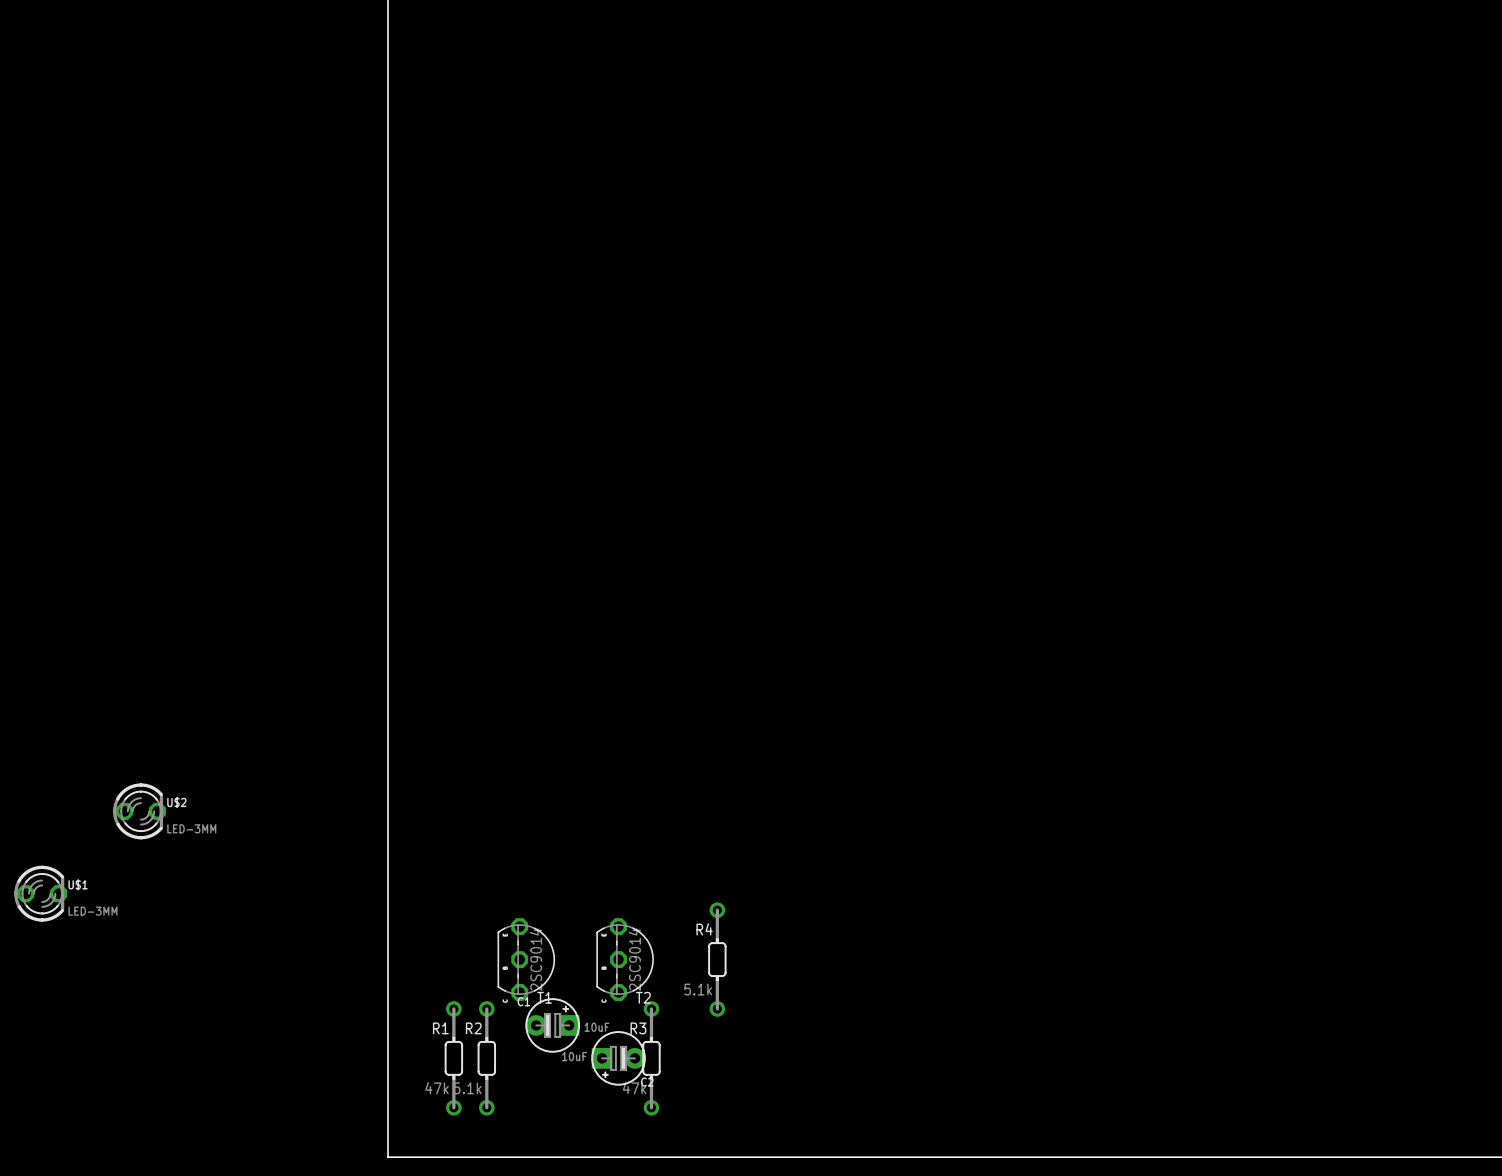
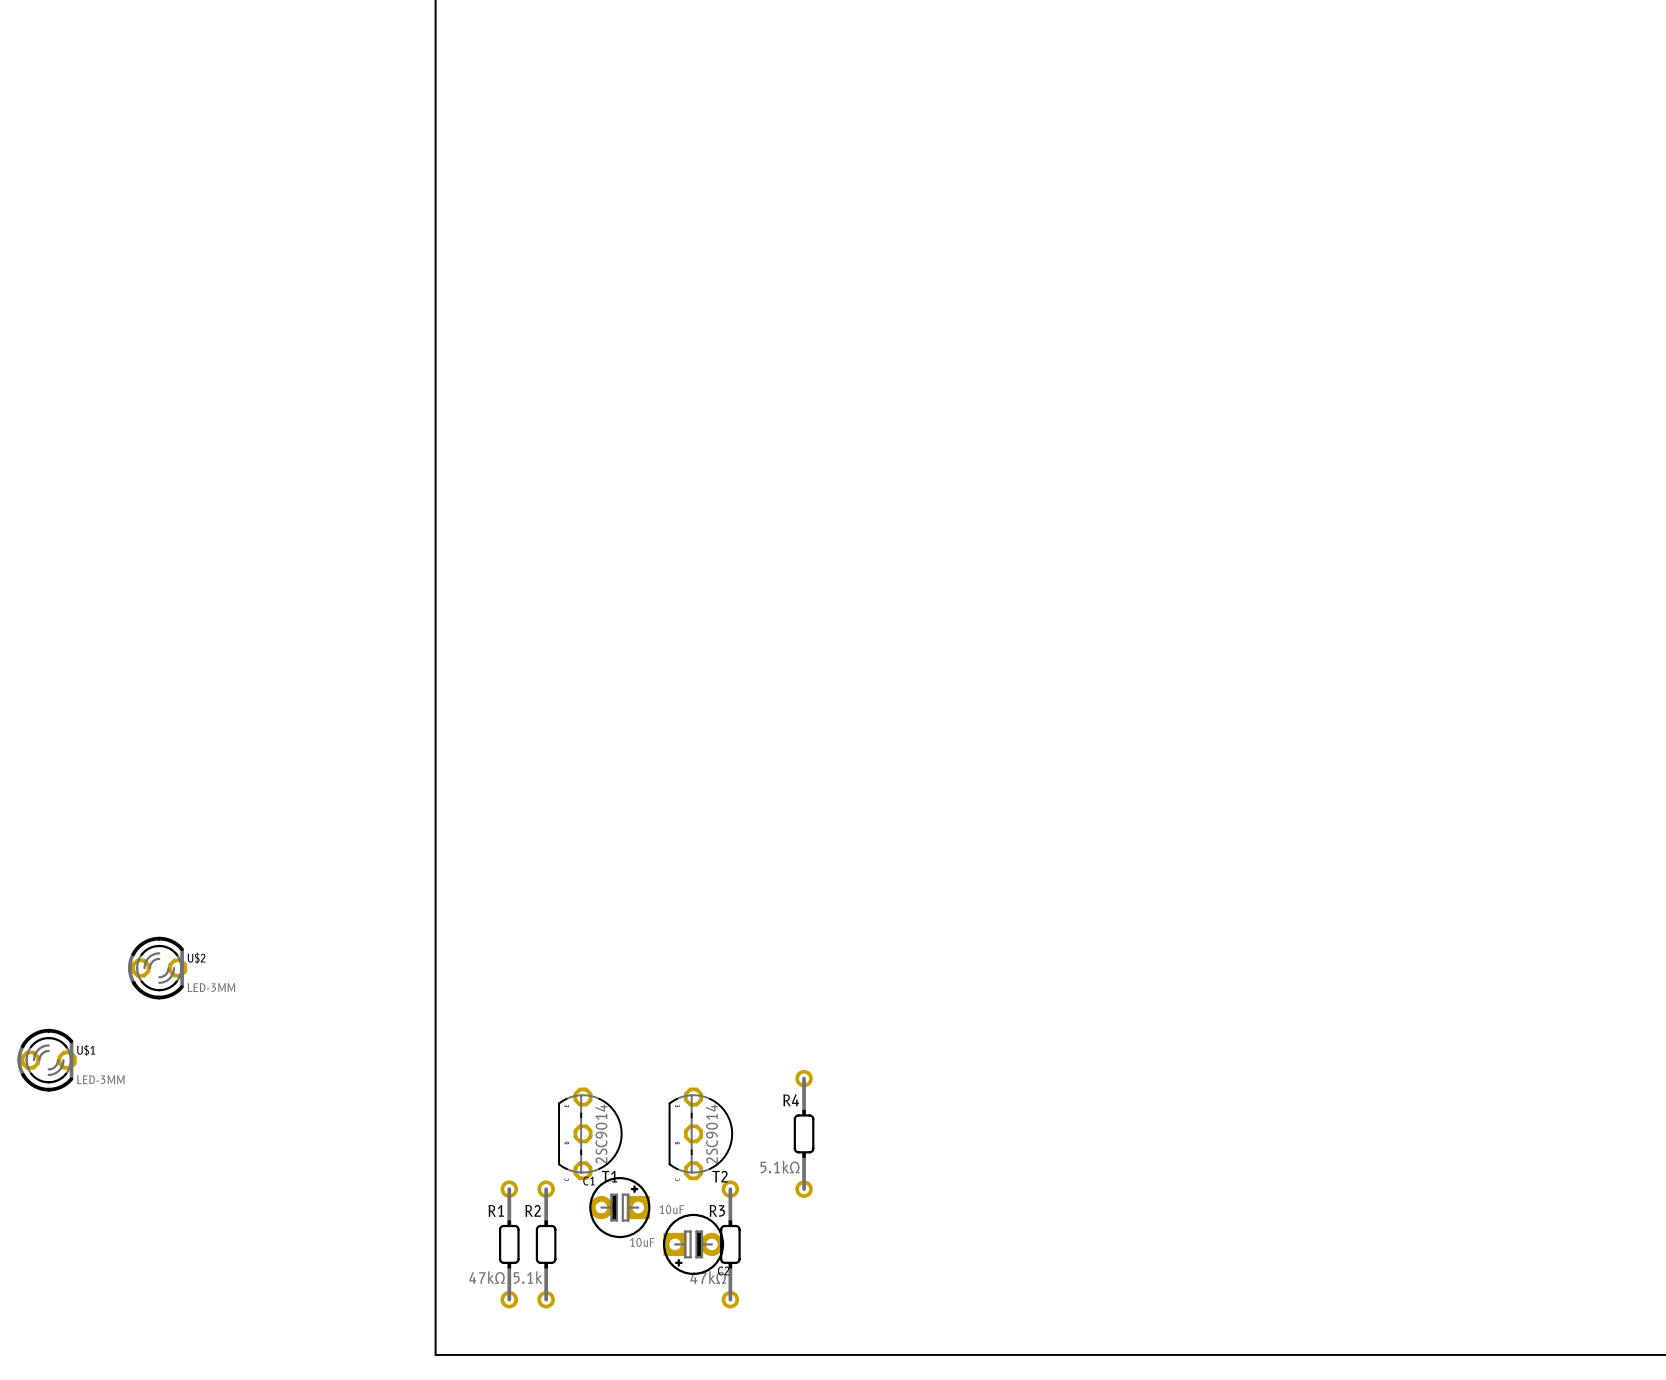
R4 value: 5.1k (698, 989) -> 5.1kΩ (780, 1167)
R1 value: 47k (437, 1088) -> 47kΩ (487, 1277)
R3 value: 47k (634, 1088) -> 47kΩ (708, 1277)

